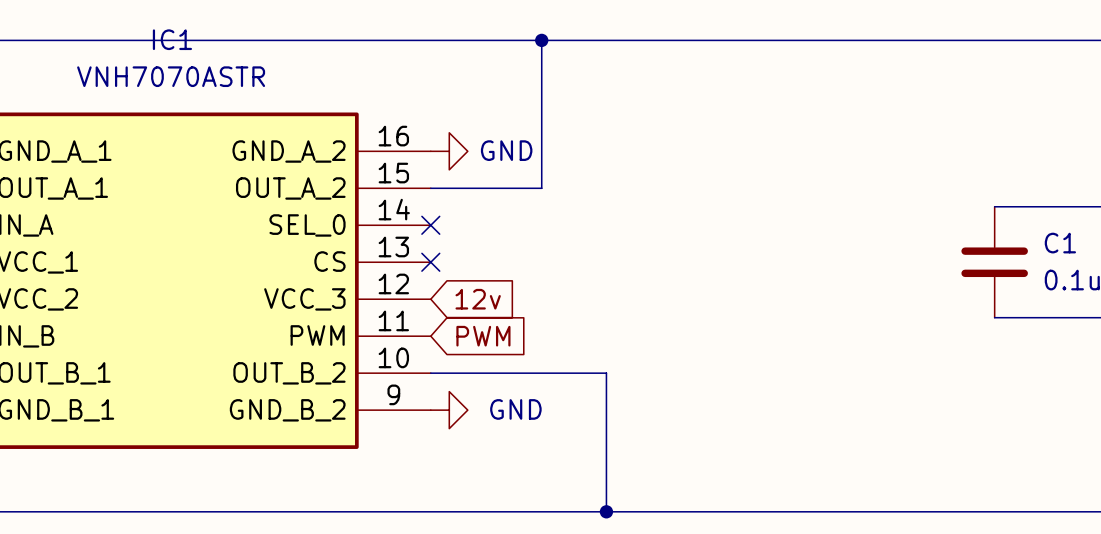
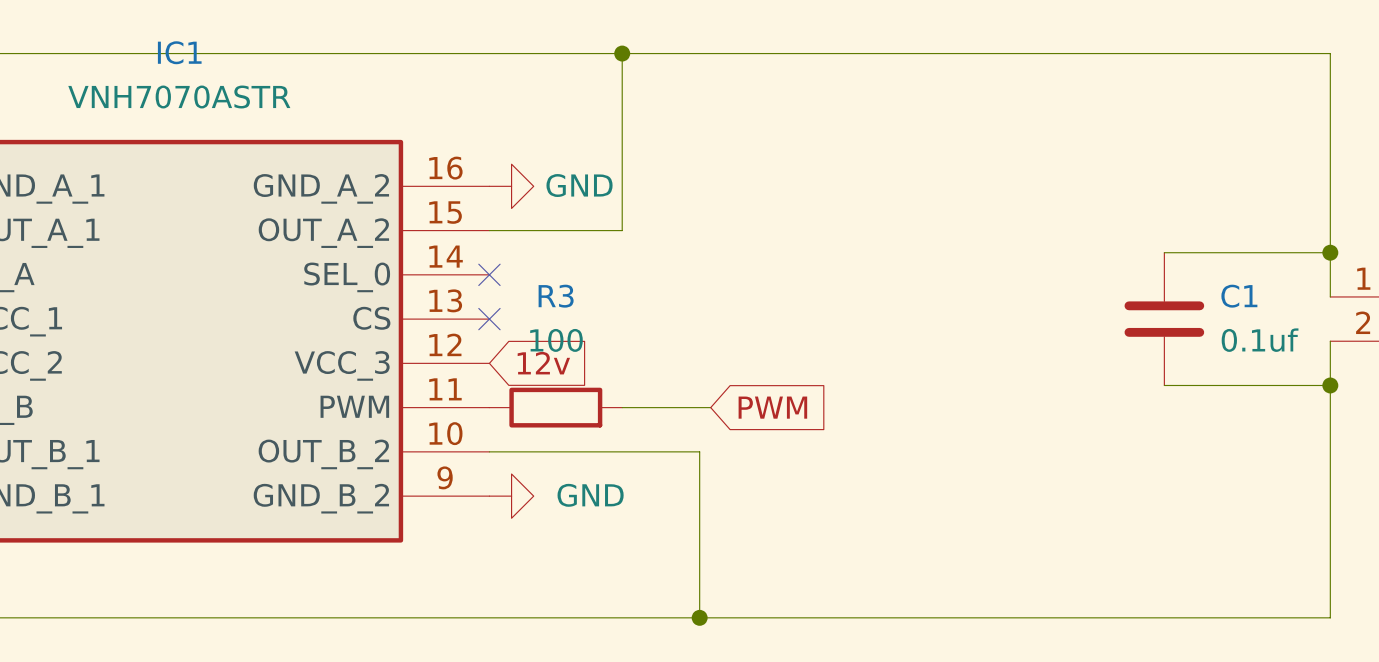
global label position: PWM (483, 336) -> PWM (772, 407)
R3: none -> 100 (555, 407)
wire: none -> (622, 407) (710, 407)

